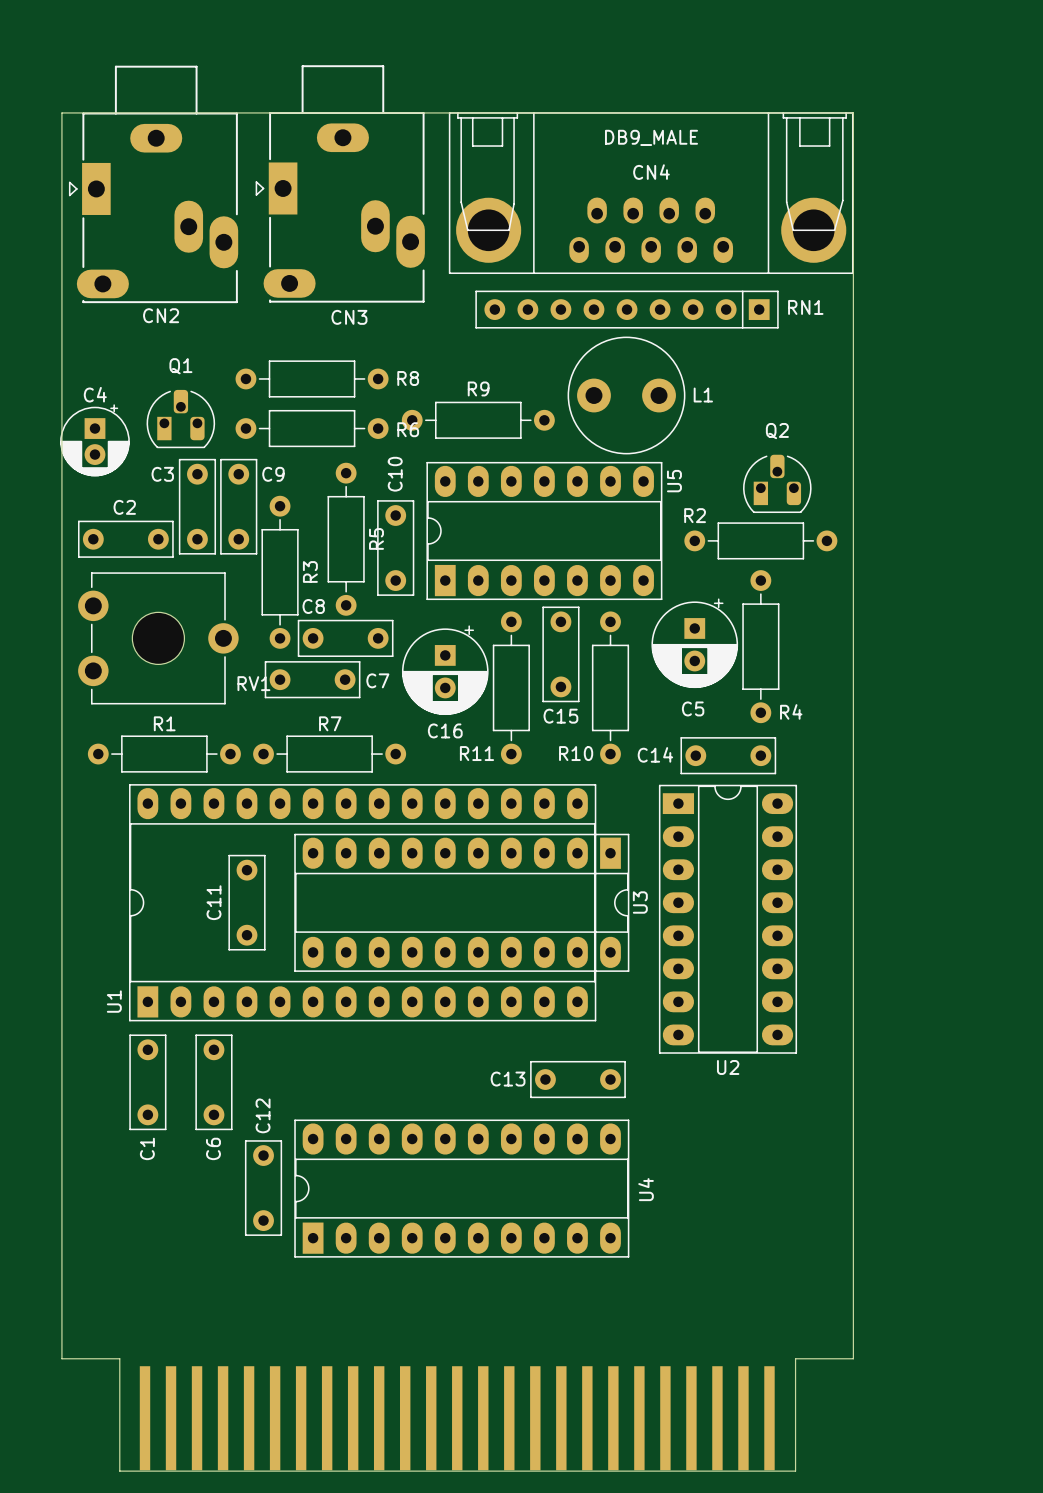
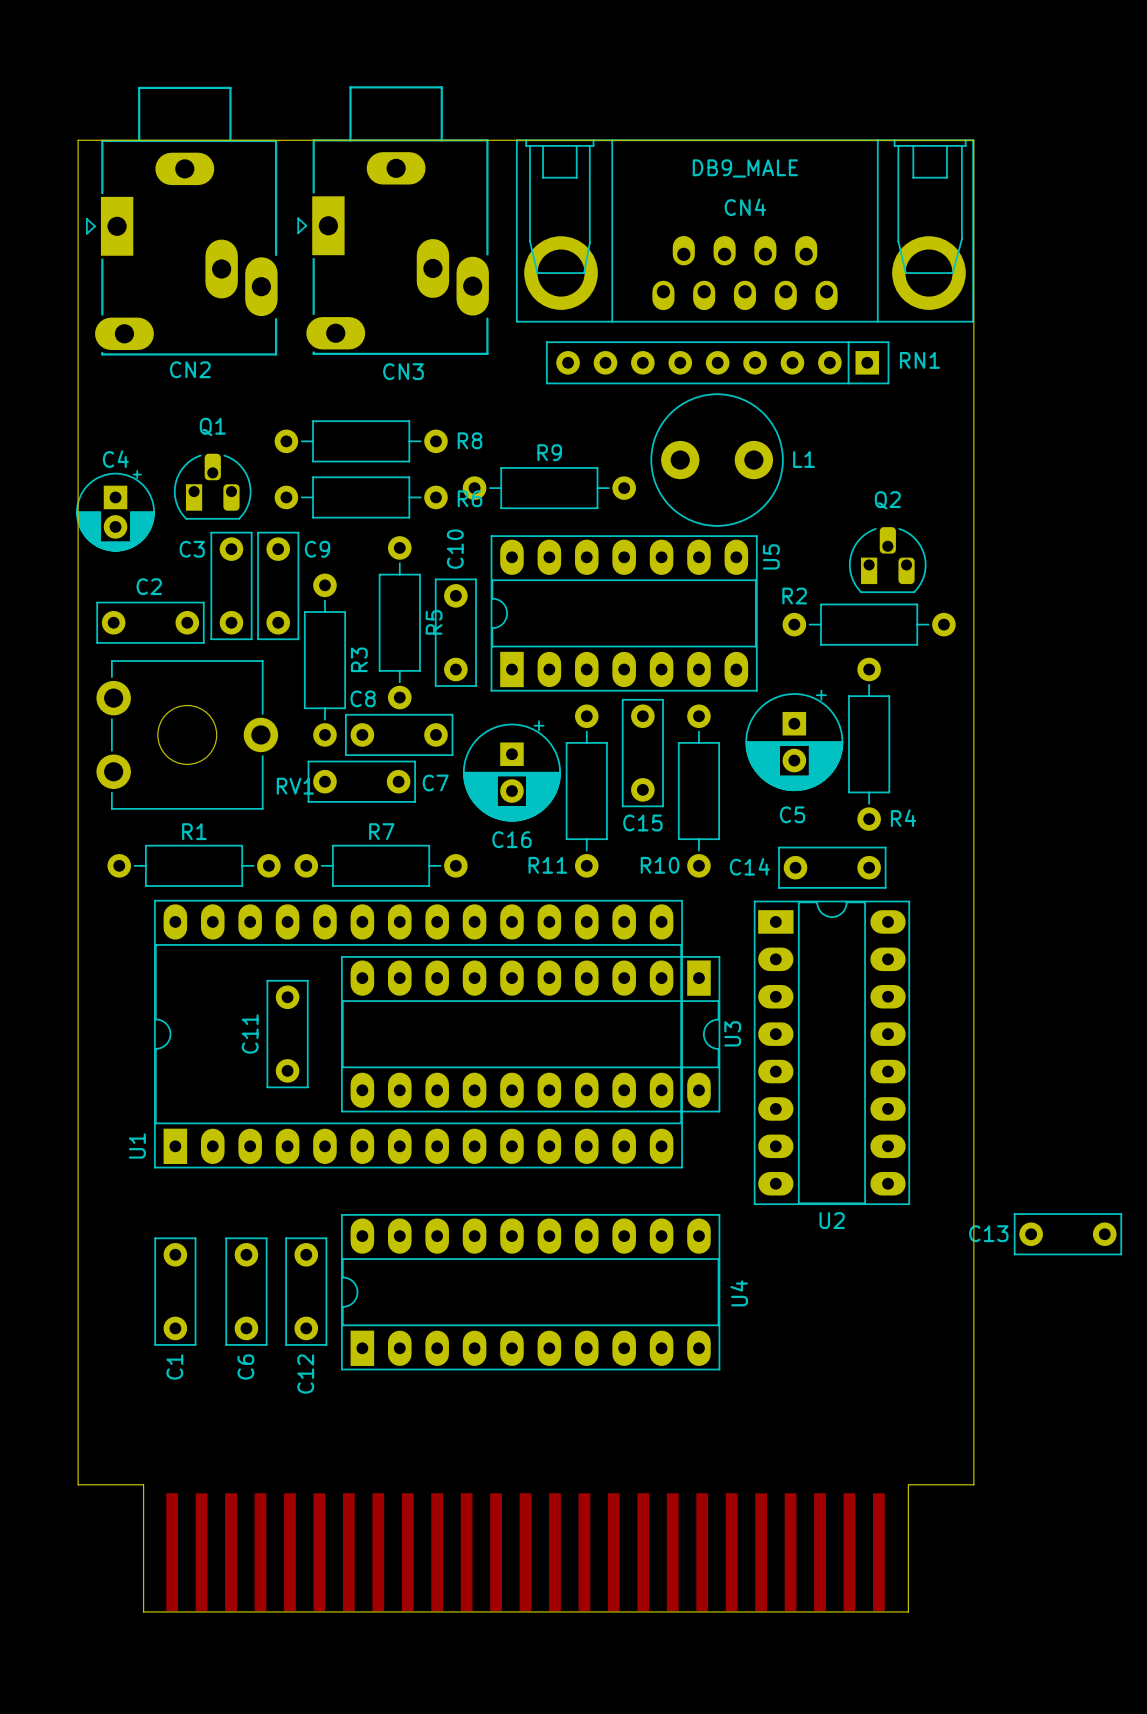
C13 position: (577, 1079) -> (1067, 1234)
C1 position: (147, 1082) -> (175, 1291)
C6 position: (213, 1082) -> (246, 1291)
C12 name position: C12 (263, 1115) -> C12 (305, 1374)
C12 position: (263, 1188) -> (306, 1291)
U4 position: (461, 1188) -> (530, 1292)
board edge: (61, 1300) (61, 1358) (119, 1358) -> (78, 1484) (143, 1484) (143, 1550)
board edge: (853, 1300) (853, 1358) (795, 1358) -> (973, 1484) (908, 1484) (908, 1550)
board edge: (119, 1413) (119, 1471) (795, 1471) (795, 1413) -> (143, 1611) (908, 1611)
part position: (457, 1418) -> (525, 1552)

